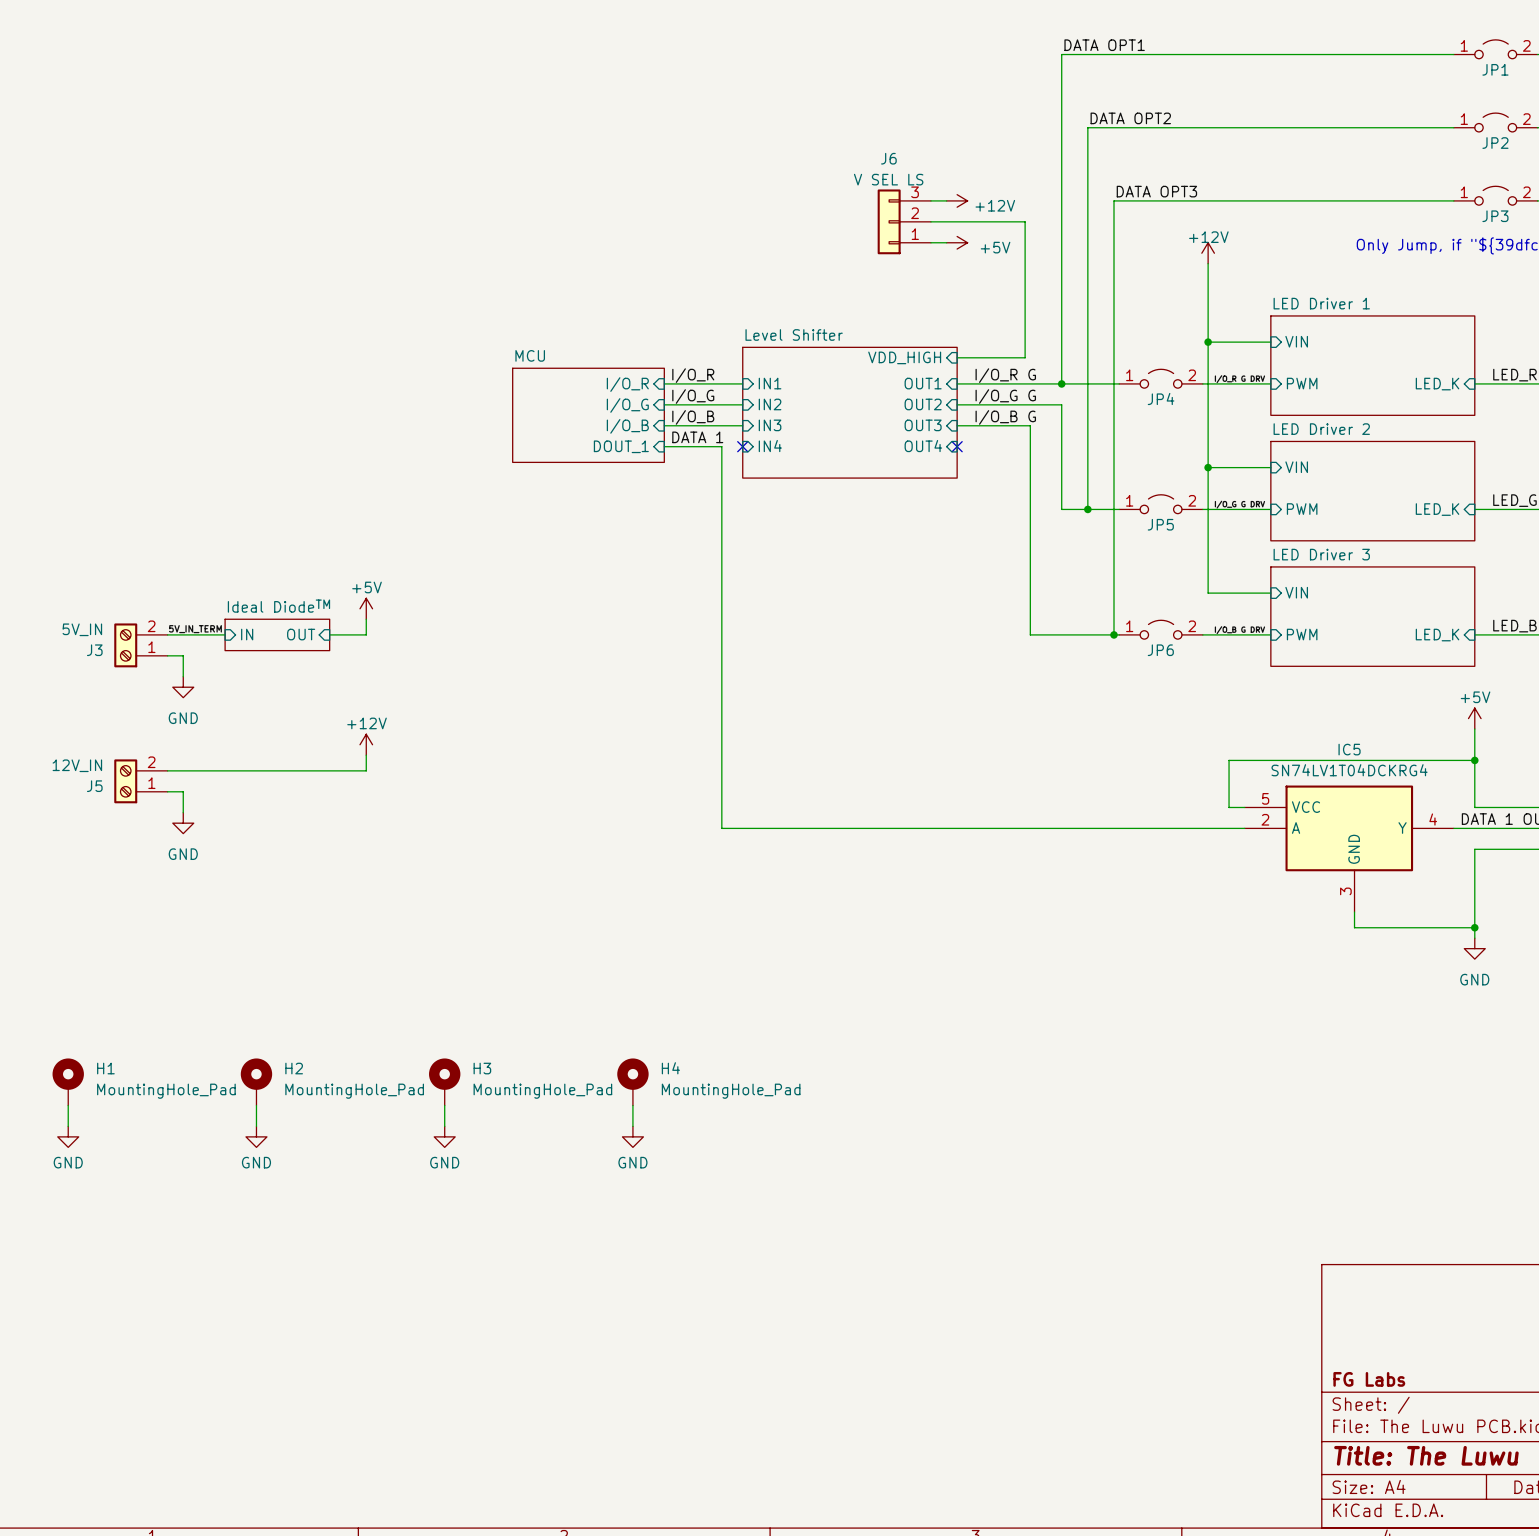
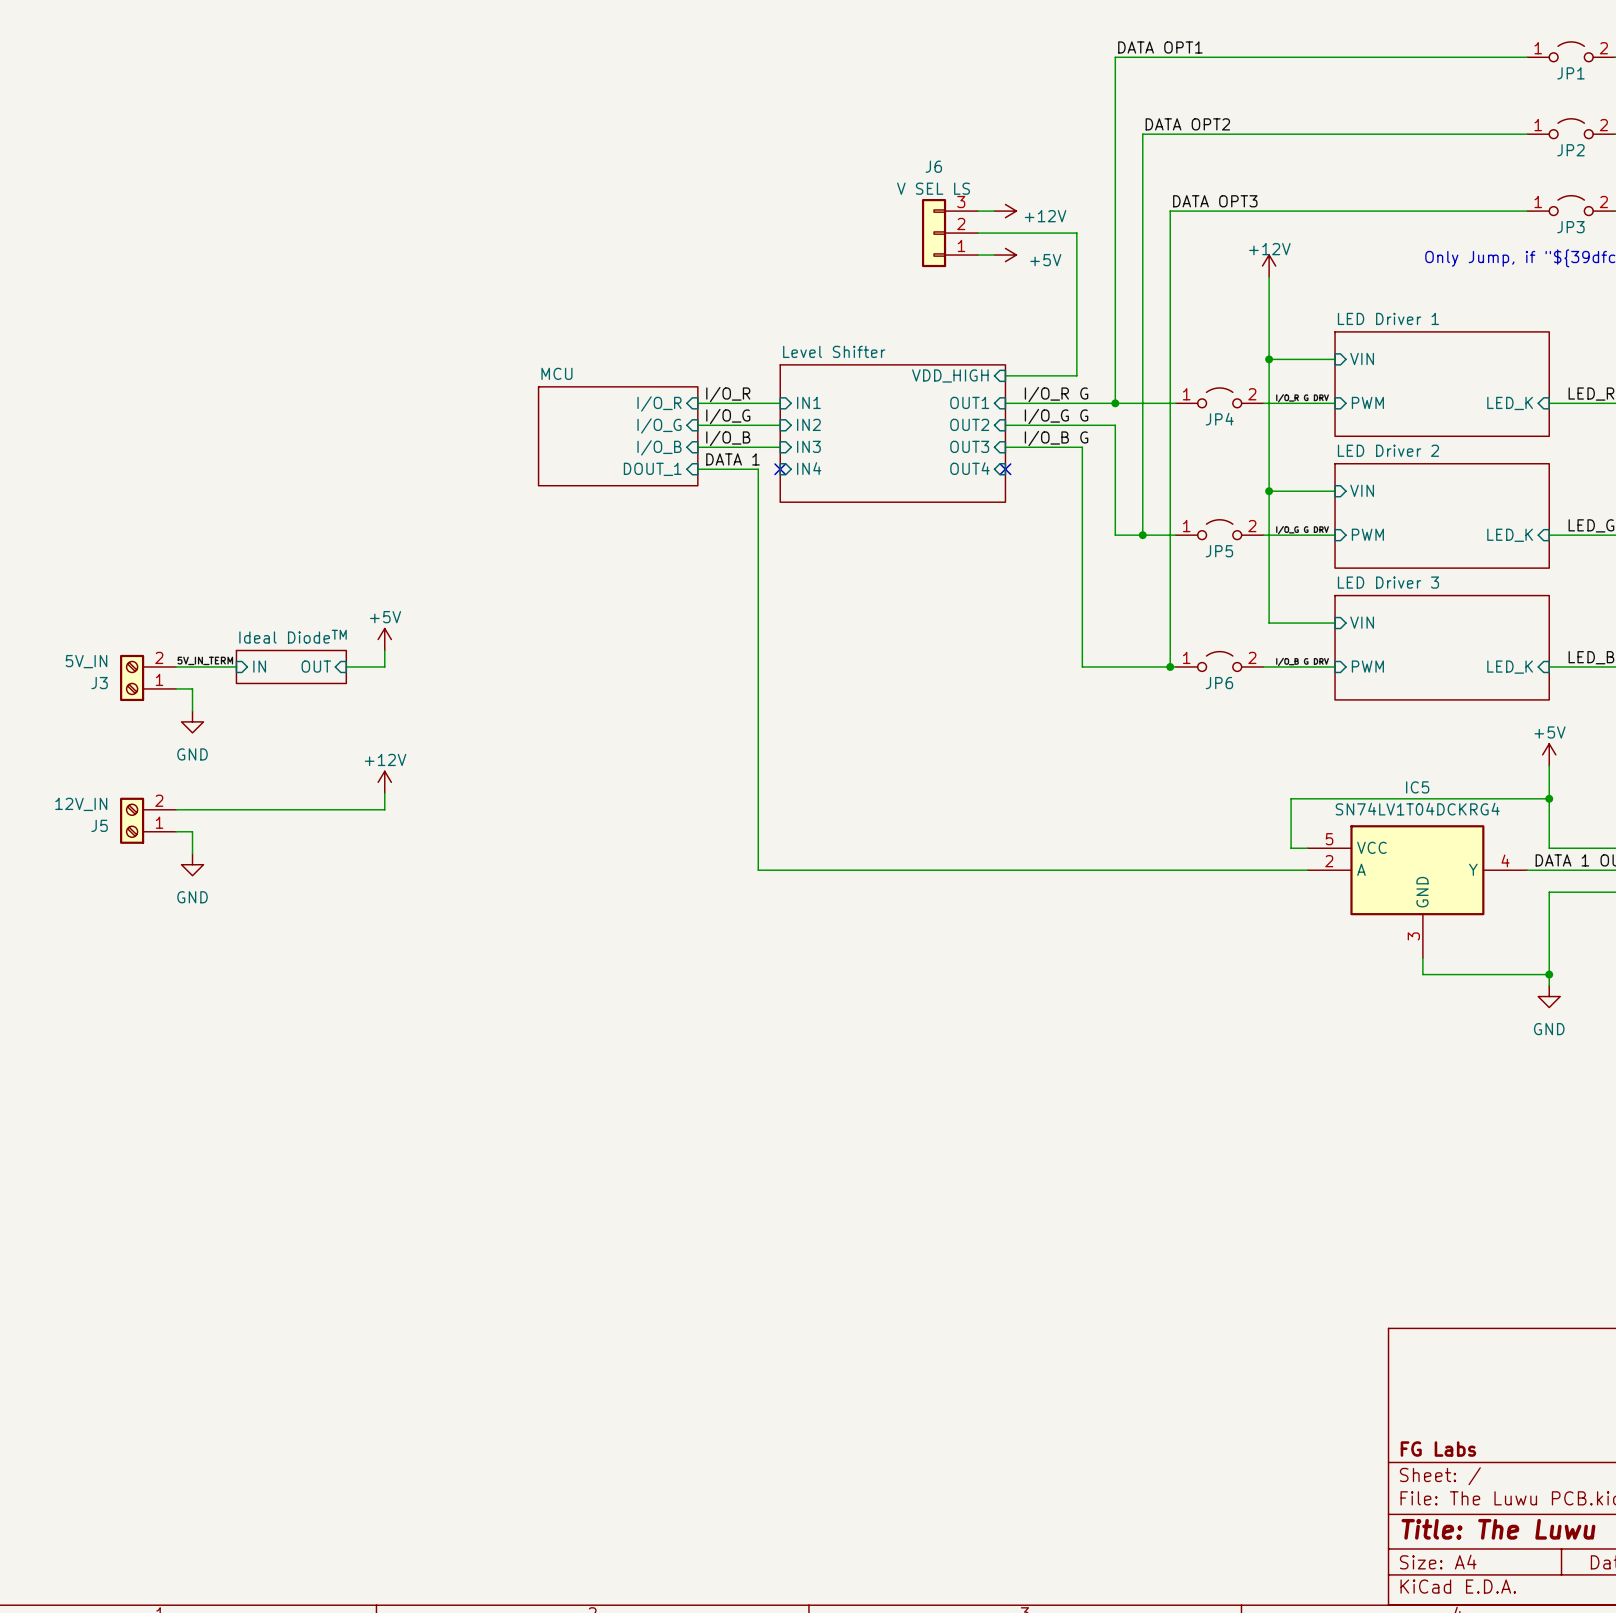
H1: MountingHole_Pad (68, 1081) -> none
H2: MountingHole_Pad (256, 1081) -> none
H3: MountingHole_Pad (444, 1081) -> none
H4: MountingHole_Pad (632, 1081) -> none
wire: (68, 1105) (68, 1126) -> none
wire: (256, 1105) (256, 1126) -> none
wire: (444, 1105) (444, 1126) -> none
wire: (632, 1105) (632, 1126) -> none
power symbol: GND (68, 1136) -> none
power symbol: GND (256, 1136) -> none
power symbol: GND (444, 1136) -> none
power symbol: GND (632, 1136) -> none

